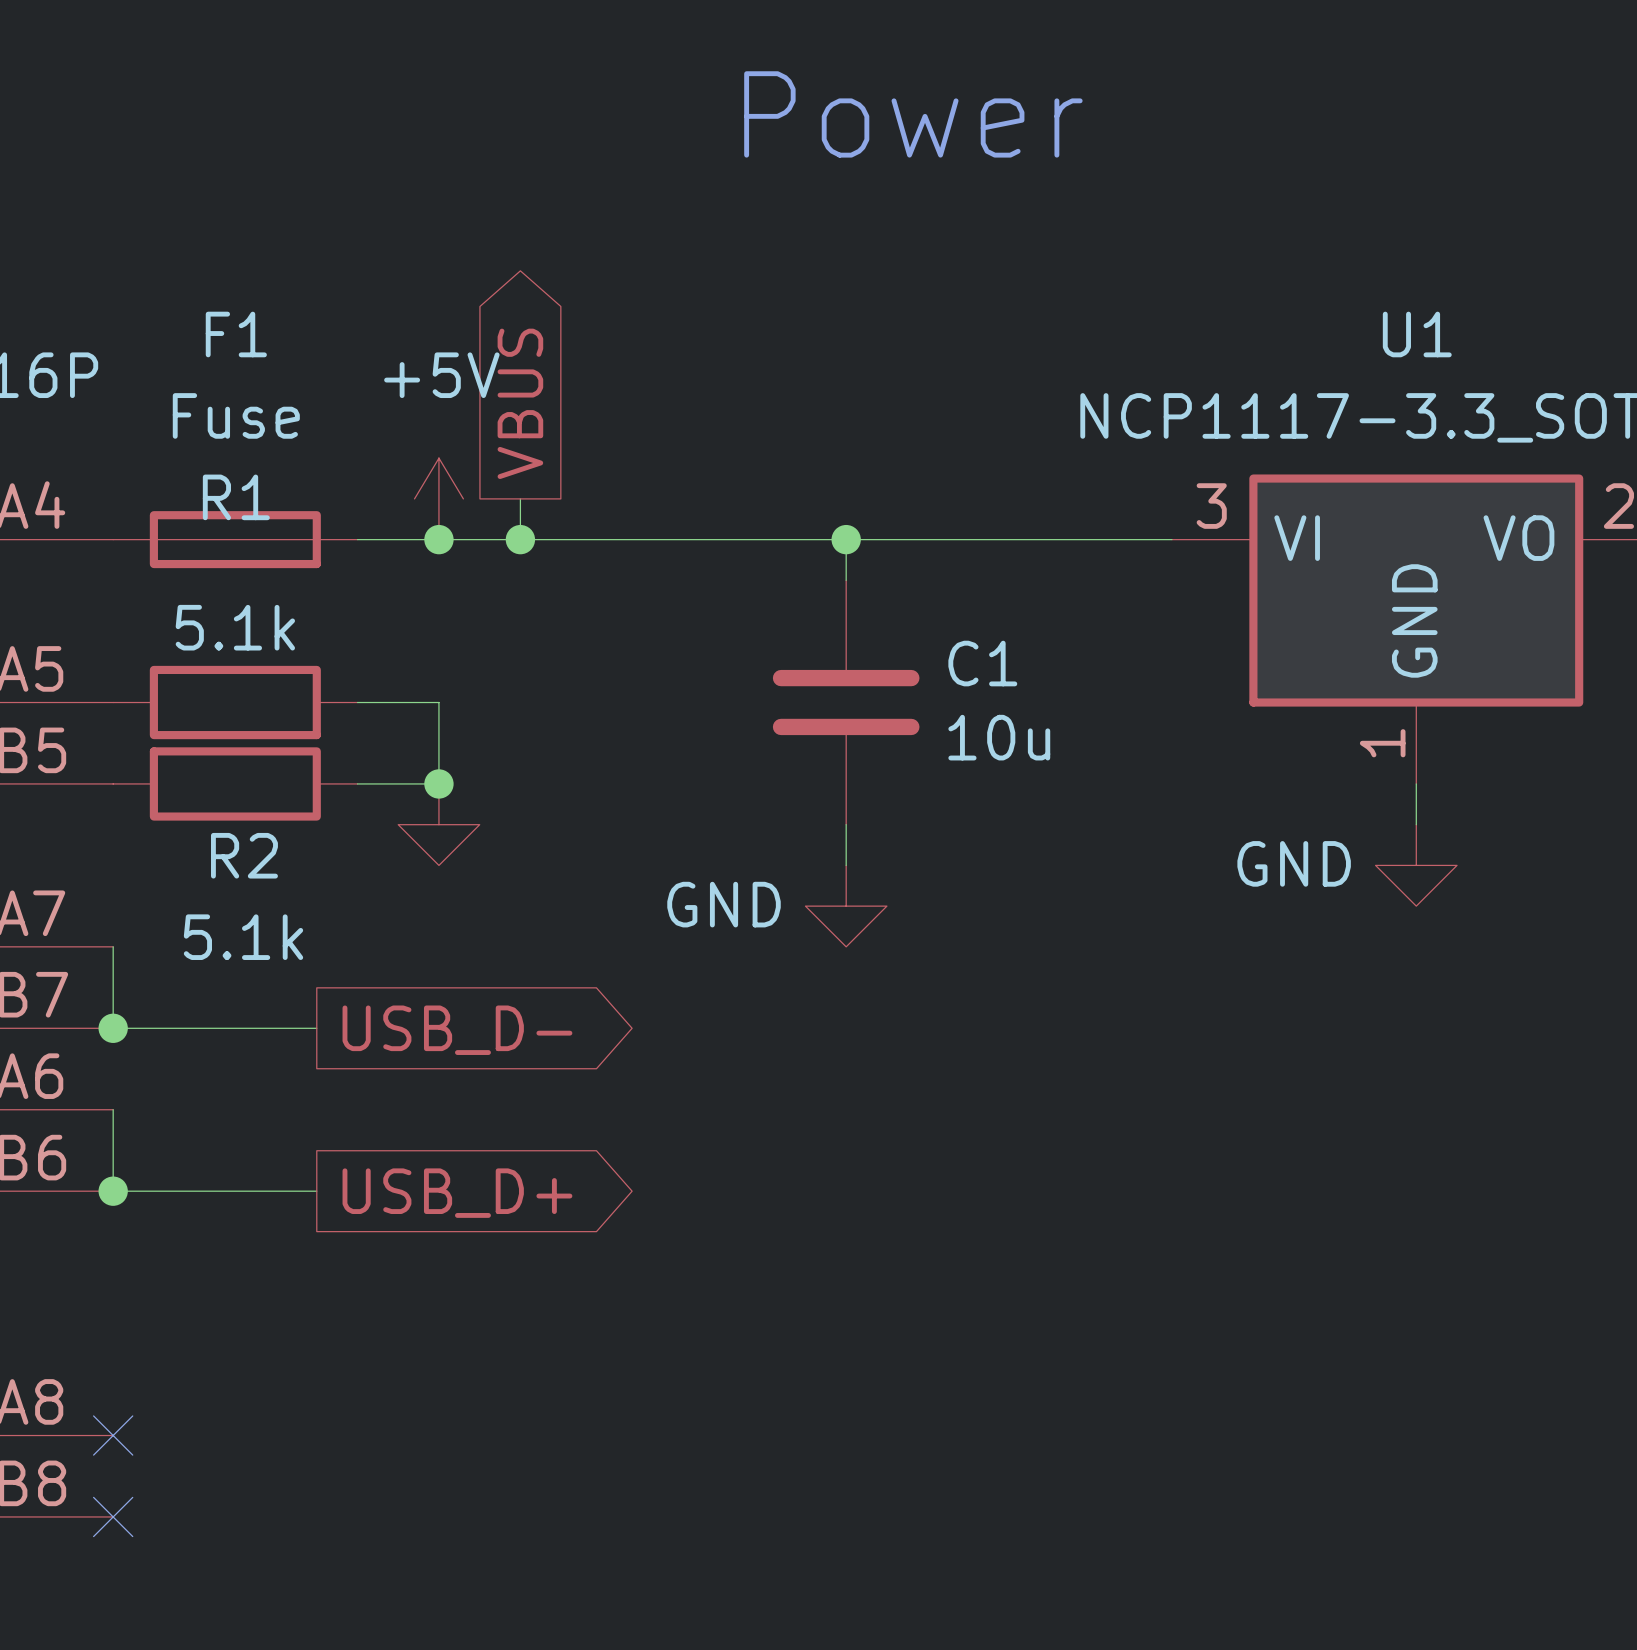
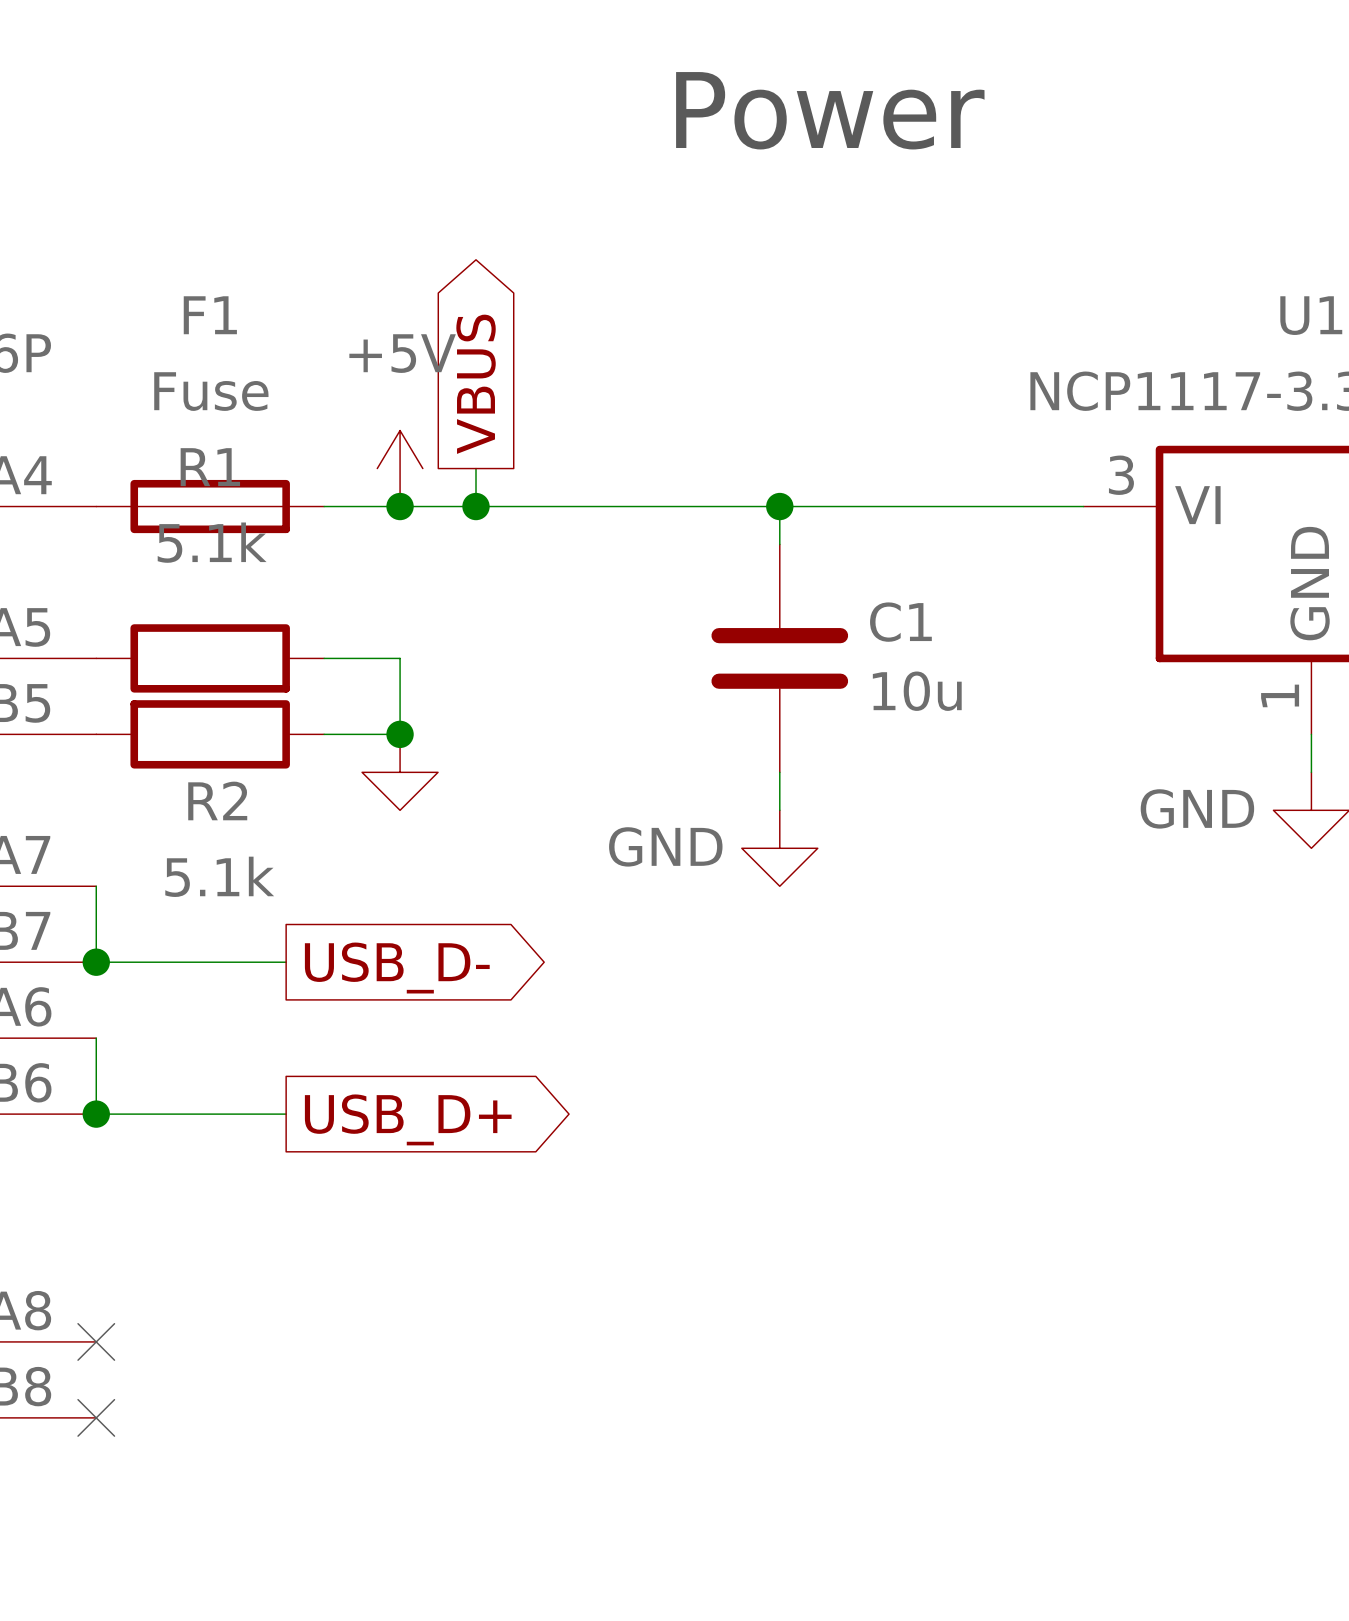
R1 value position: 5.1k (235, 627) -> 5.1k (212, 542)

